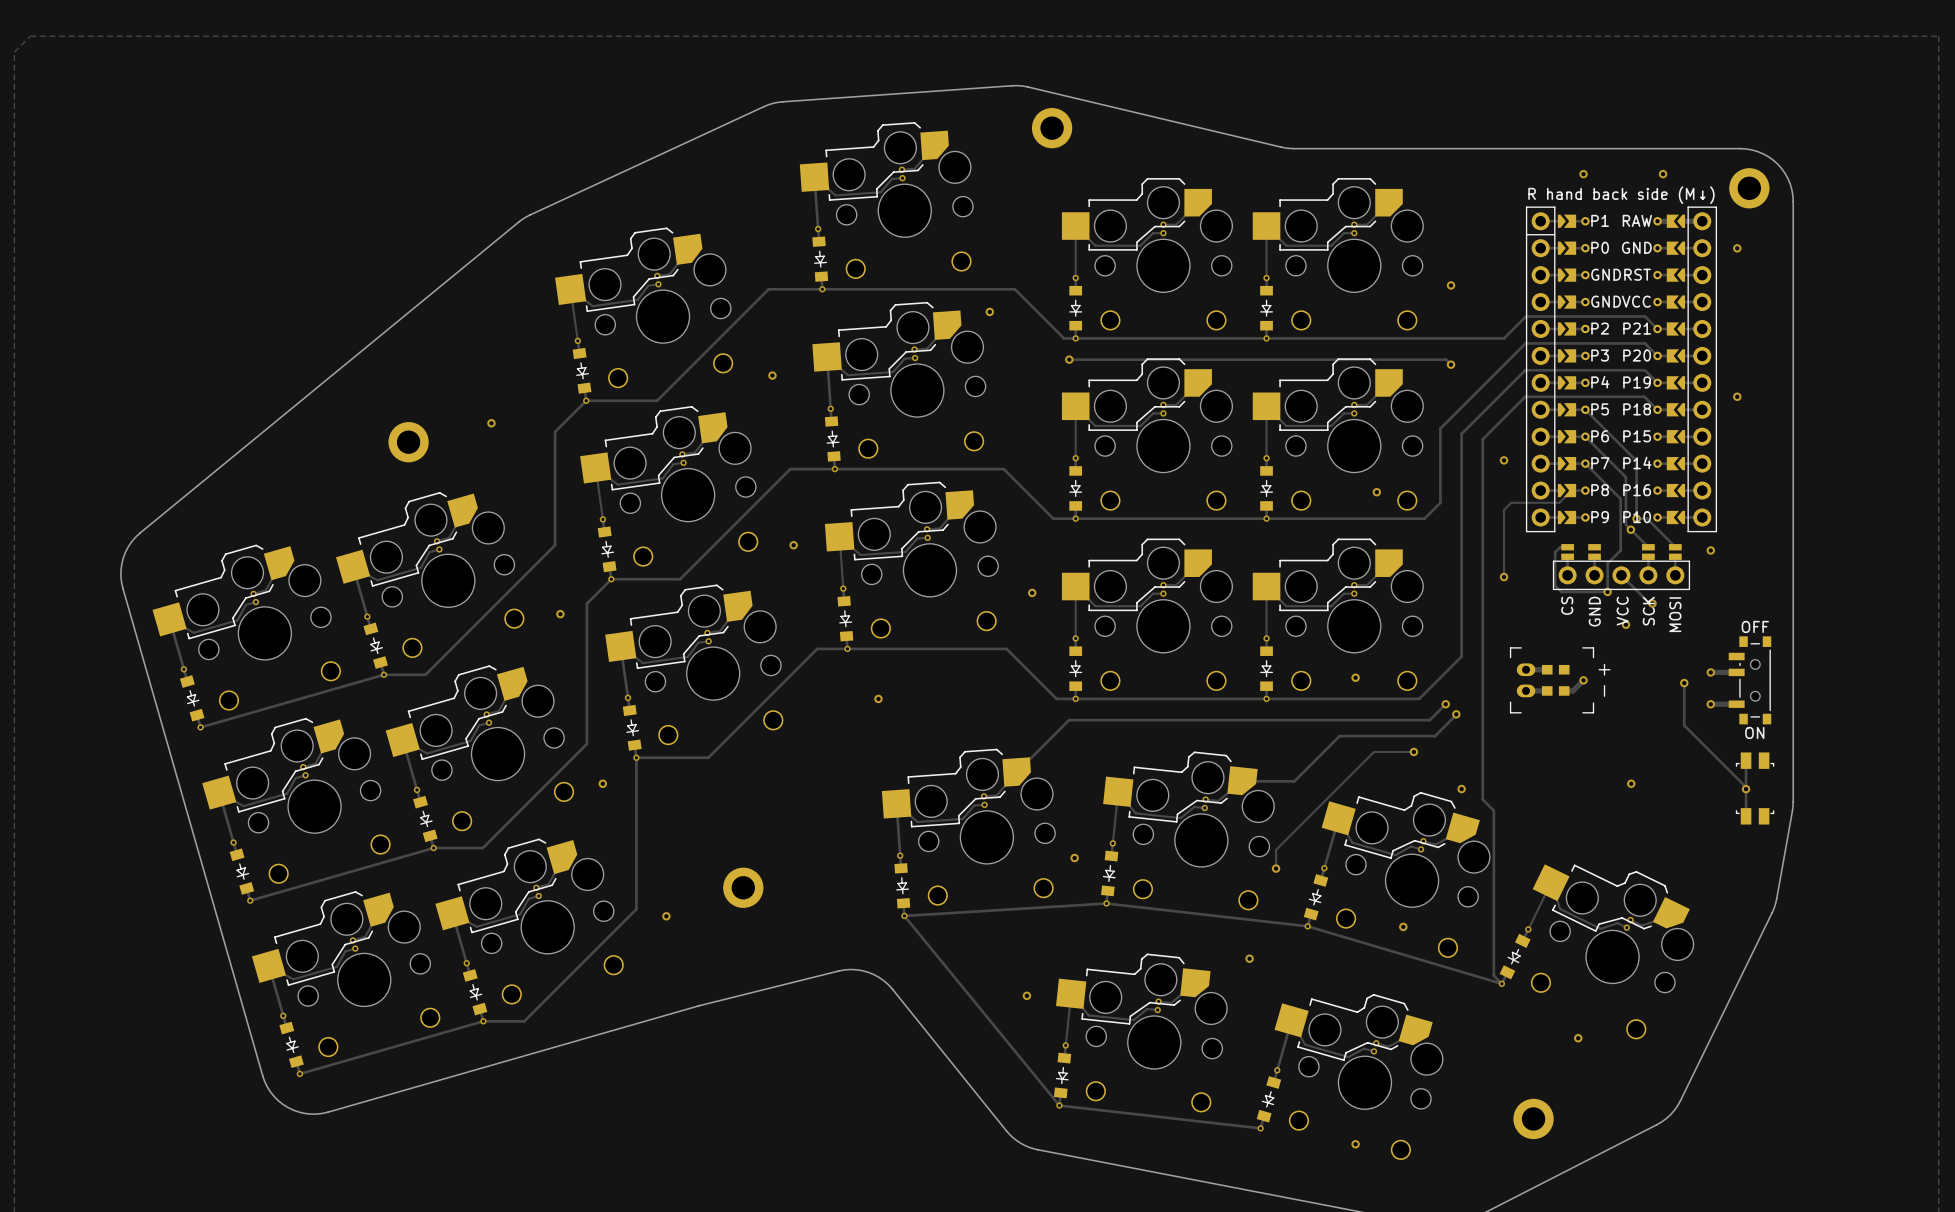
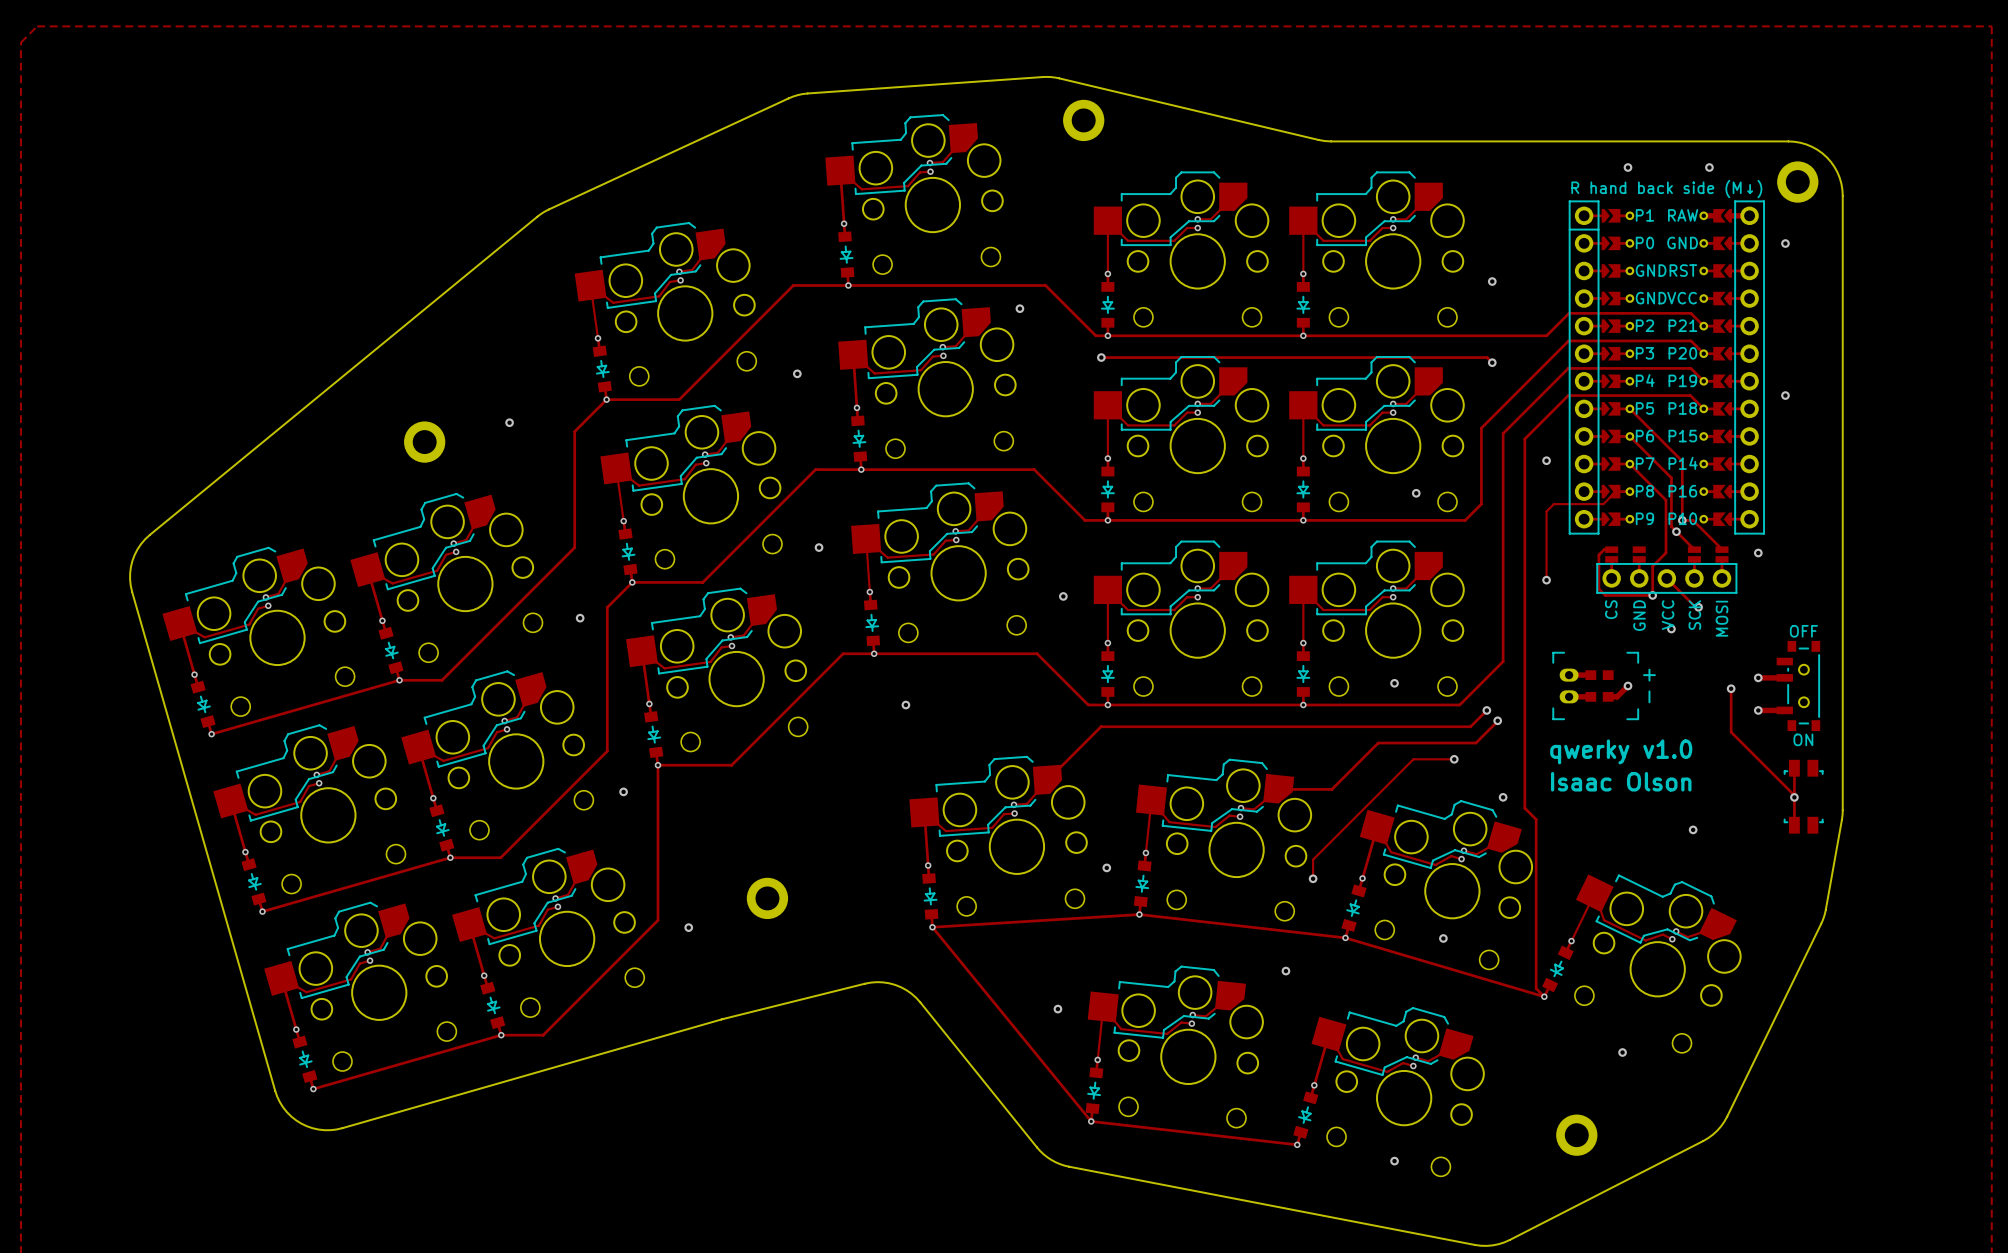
text: none -> qwerky v1.0 (1621, 751)
text: none -> Isaac Olson (1621, 781)
via position: (1631, 783) -> (1693, 829)

